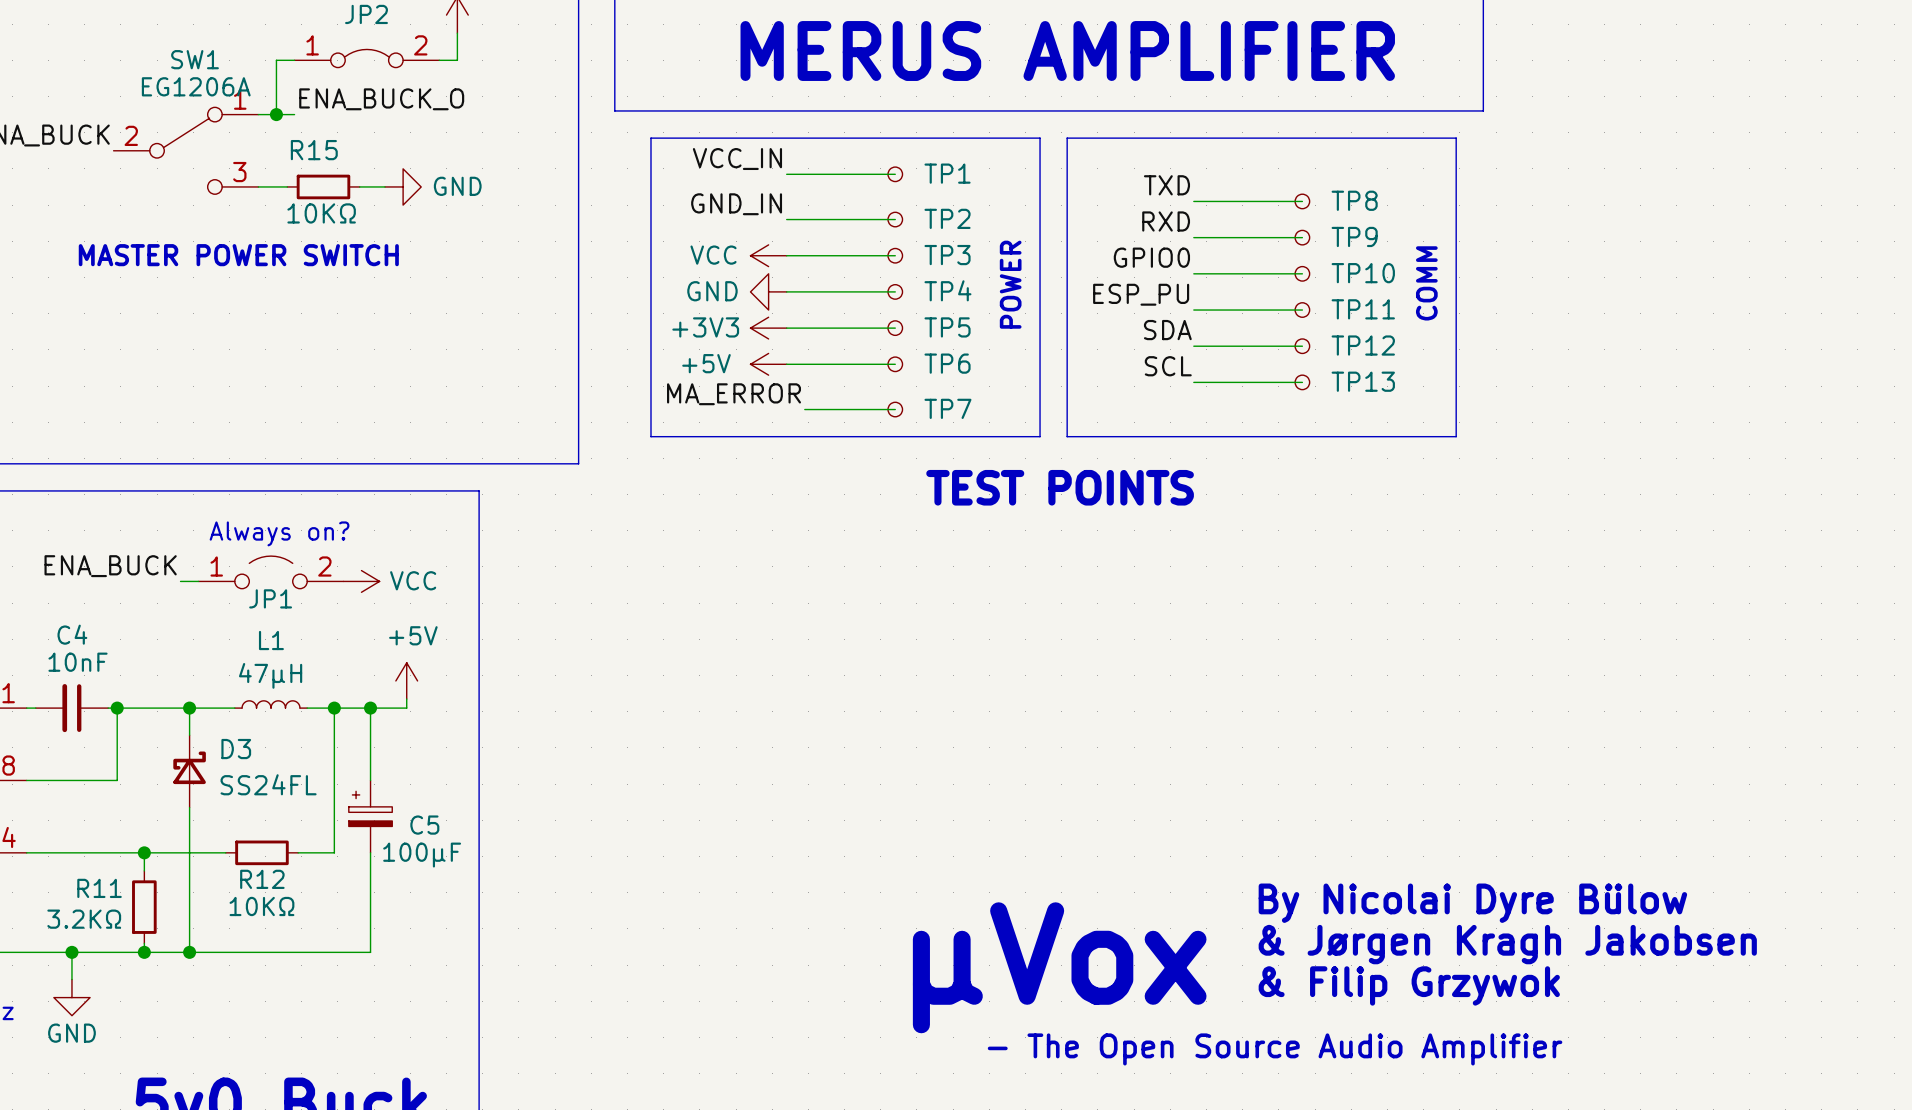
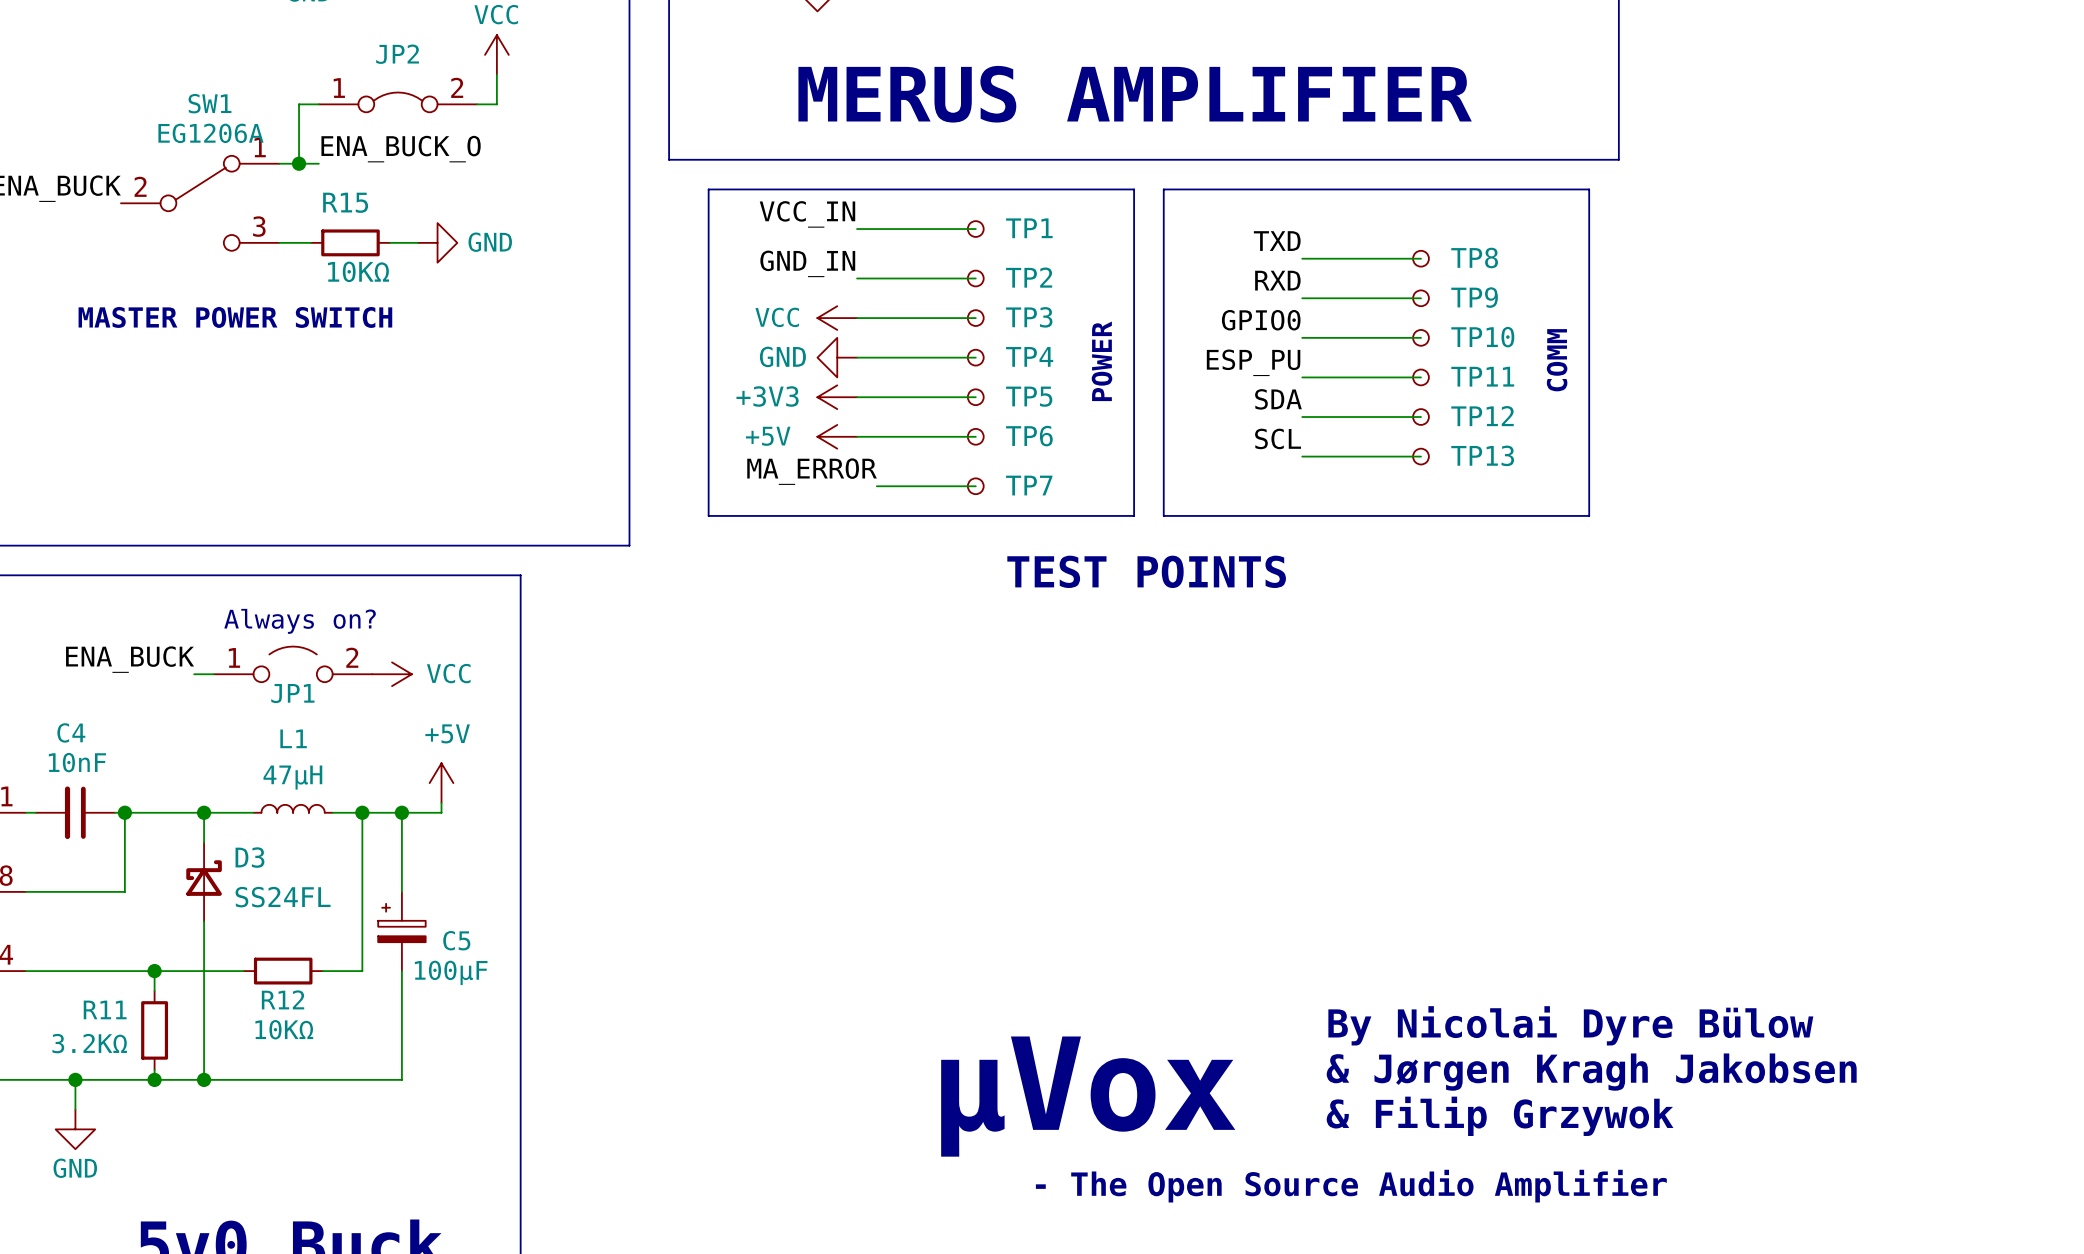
text position: By Nicolai Dyre Bülow (1472, 903) -> By Nicolai Dyre Bülow (1570, 1025)
text position: & Jørgen Kragh Jakobsen (1507, 944) -> & Jørgen Kragh Jakobsen (1591, 1072)
text position: µVox (1059, 967) -> µVox (1088, 1096)
text position: & Filip Grzywok (1409, 985) -> & Filip Grzywok (1500, 1116)
text position: - The Open Source Audio Amplifier (1275, 1049) -> - The Open Source Audio Amplifier (1351, 1186)

